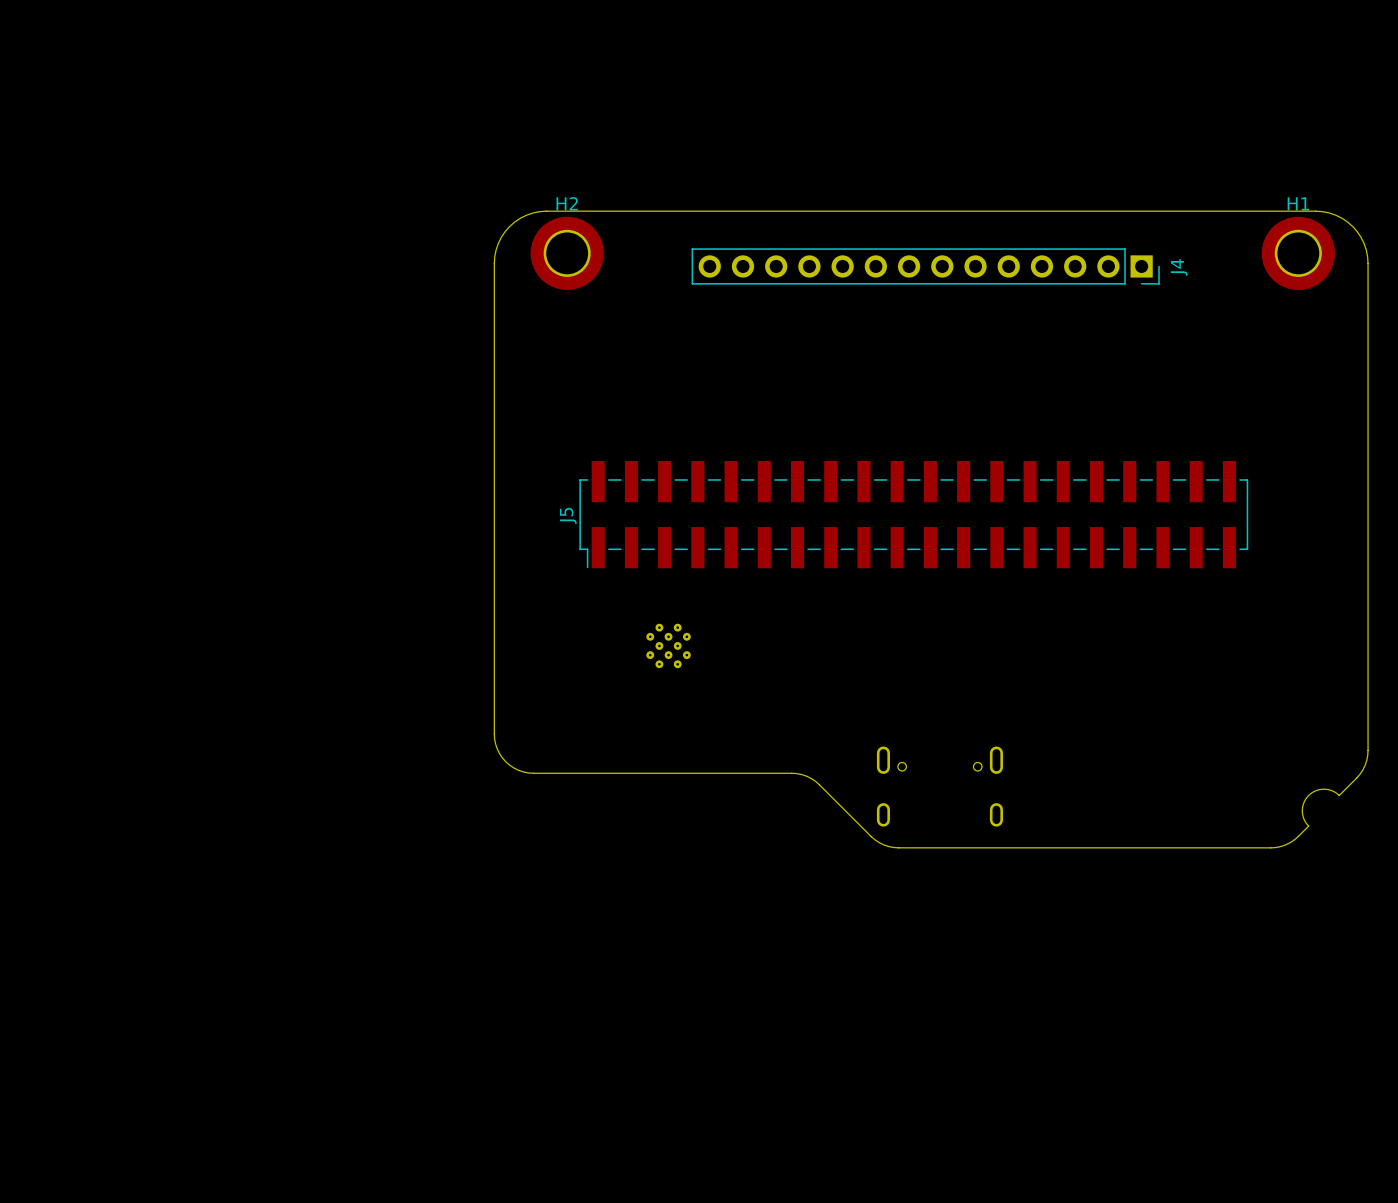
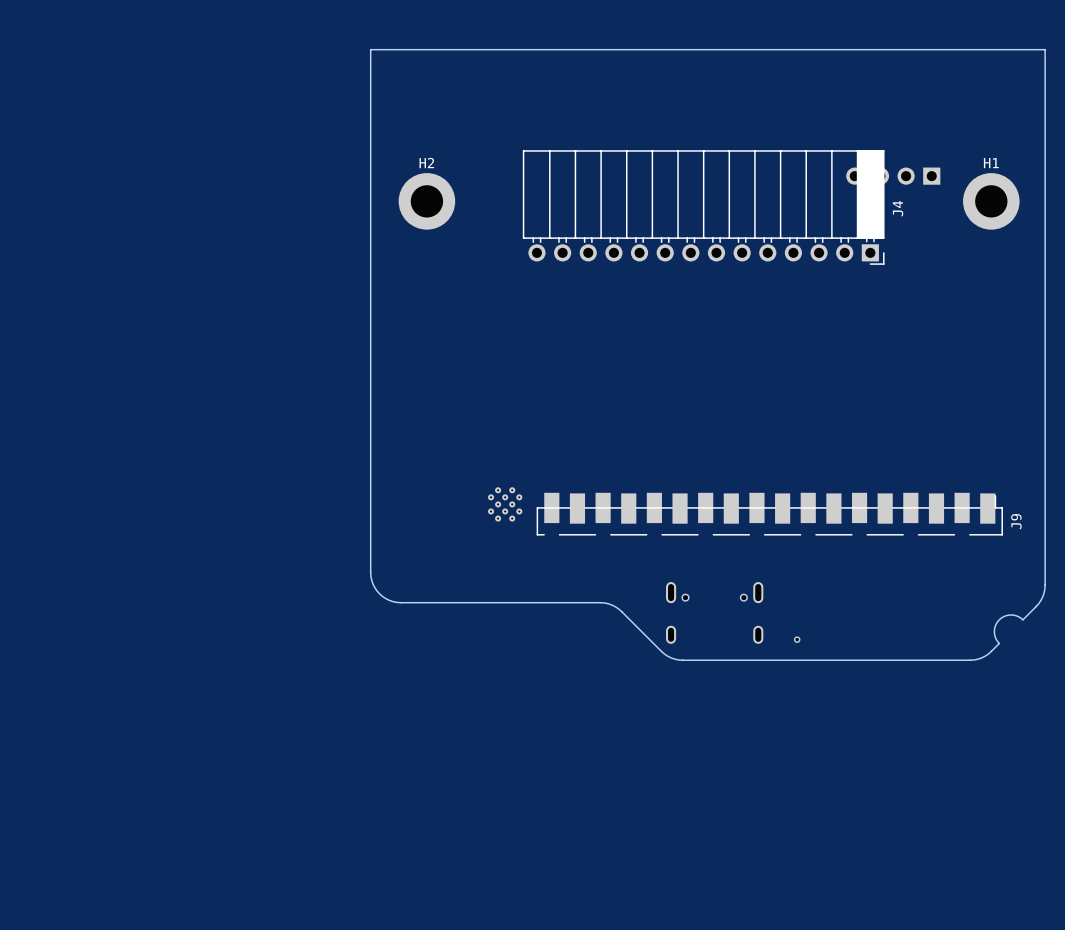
part: none -> (893, 176)
J4 footprint: [691, 248, 1160, 285] -> [522, 150, 885, 265]
board edge: (494, 263) (498, 243) (509, 226) (526, 215) (546, 211) (1315, 211) (1335, 215) (1352, 226) (1364, 243) (1368, 263) -> (370, 209) (370, 49) (1045, 49) (1045, 209)
J5: (913, 514) -> none
J9: none -> (769, 514)
part: none -> (797, 639)

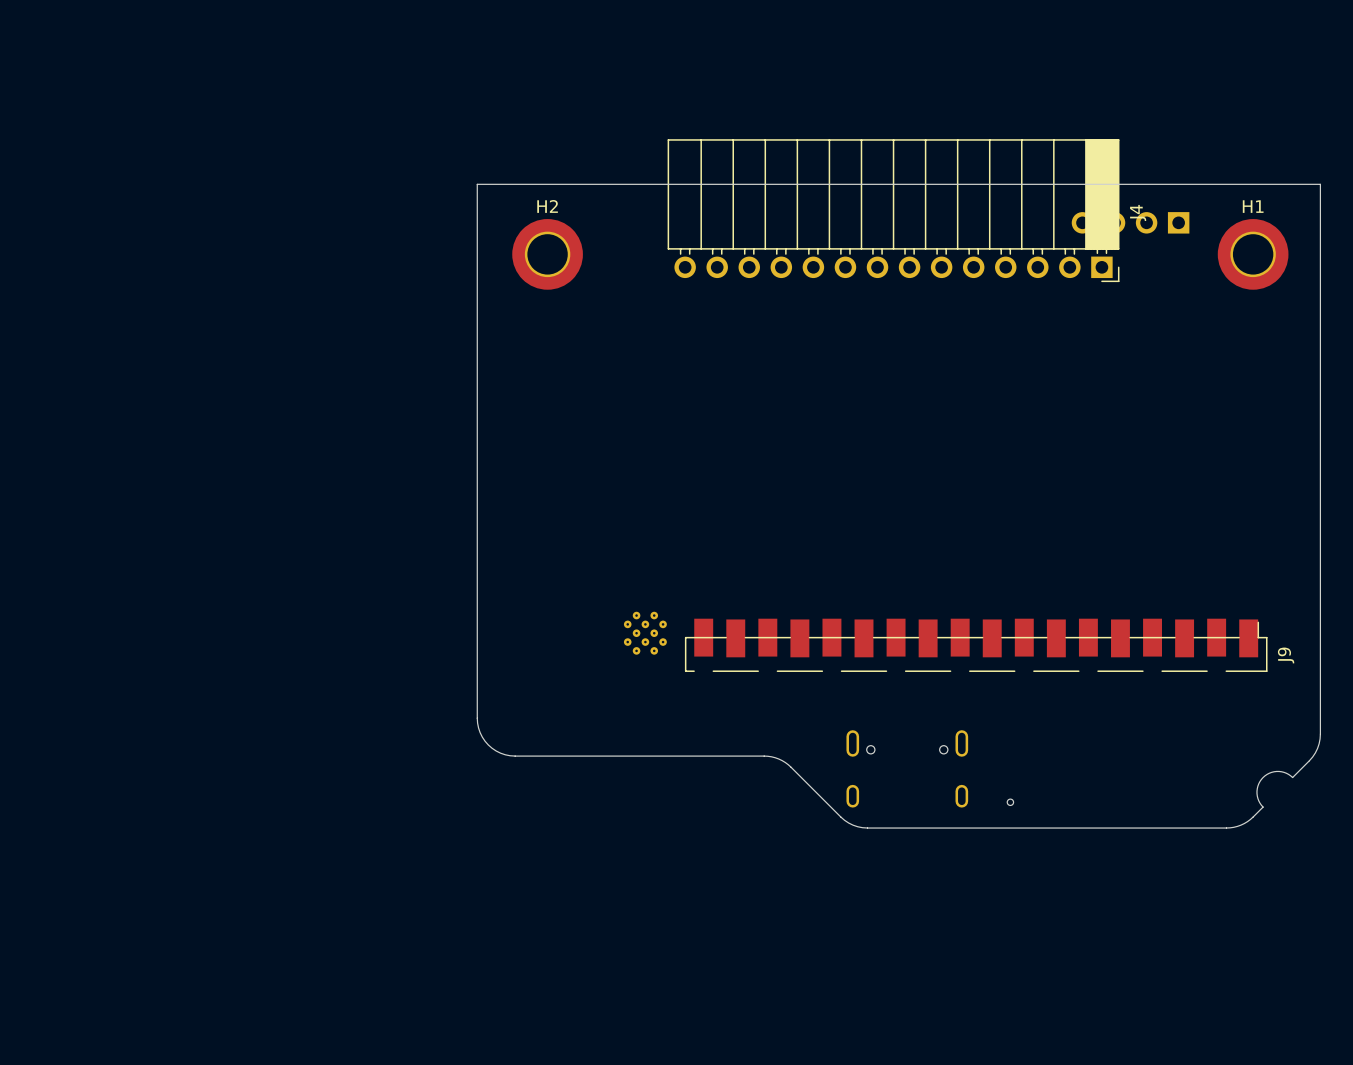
board edge: (370, 145) (370, 49) (1045, 49) (1045, 145) -> (477, 184) (1320, 184)
J4 position: (703, 207) -> (893, 210)

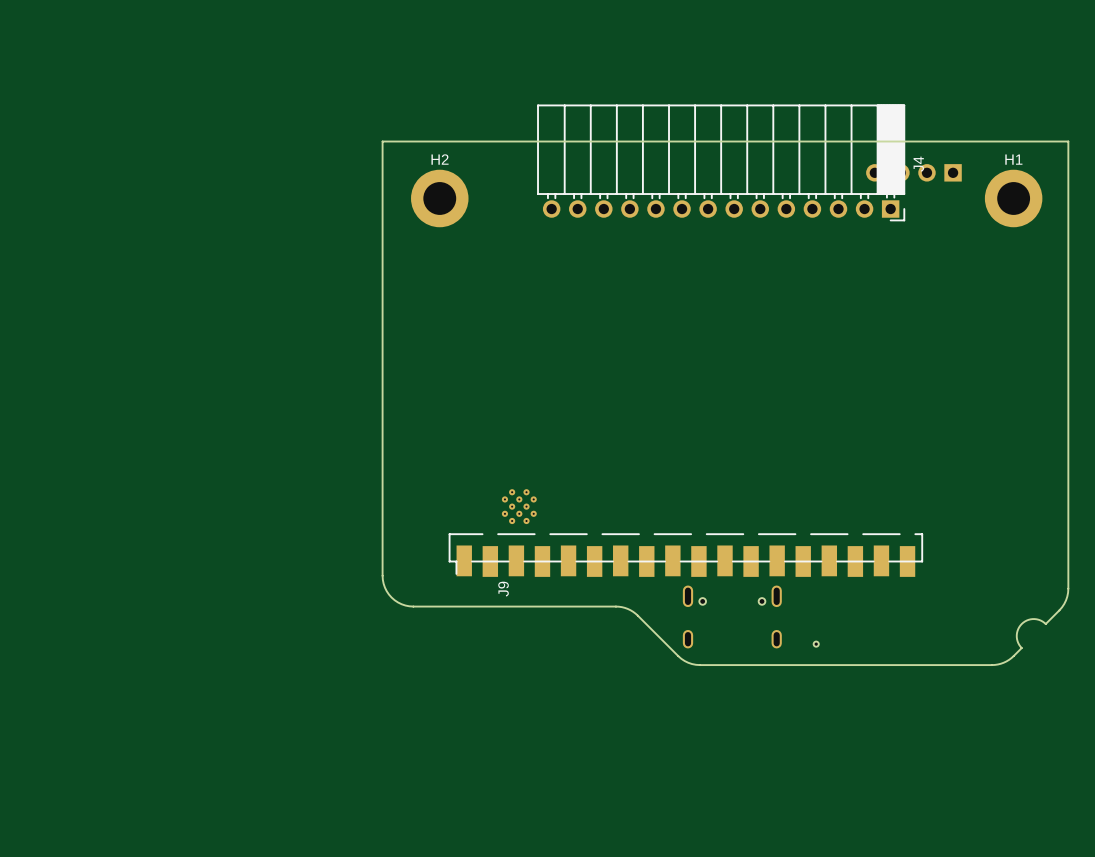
J9 rotation: 0° (976, 645) -> 180° (685, 555)
J9 name position: J9 (1286, 655) -> J9 (503, 589)

